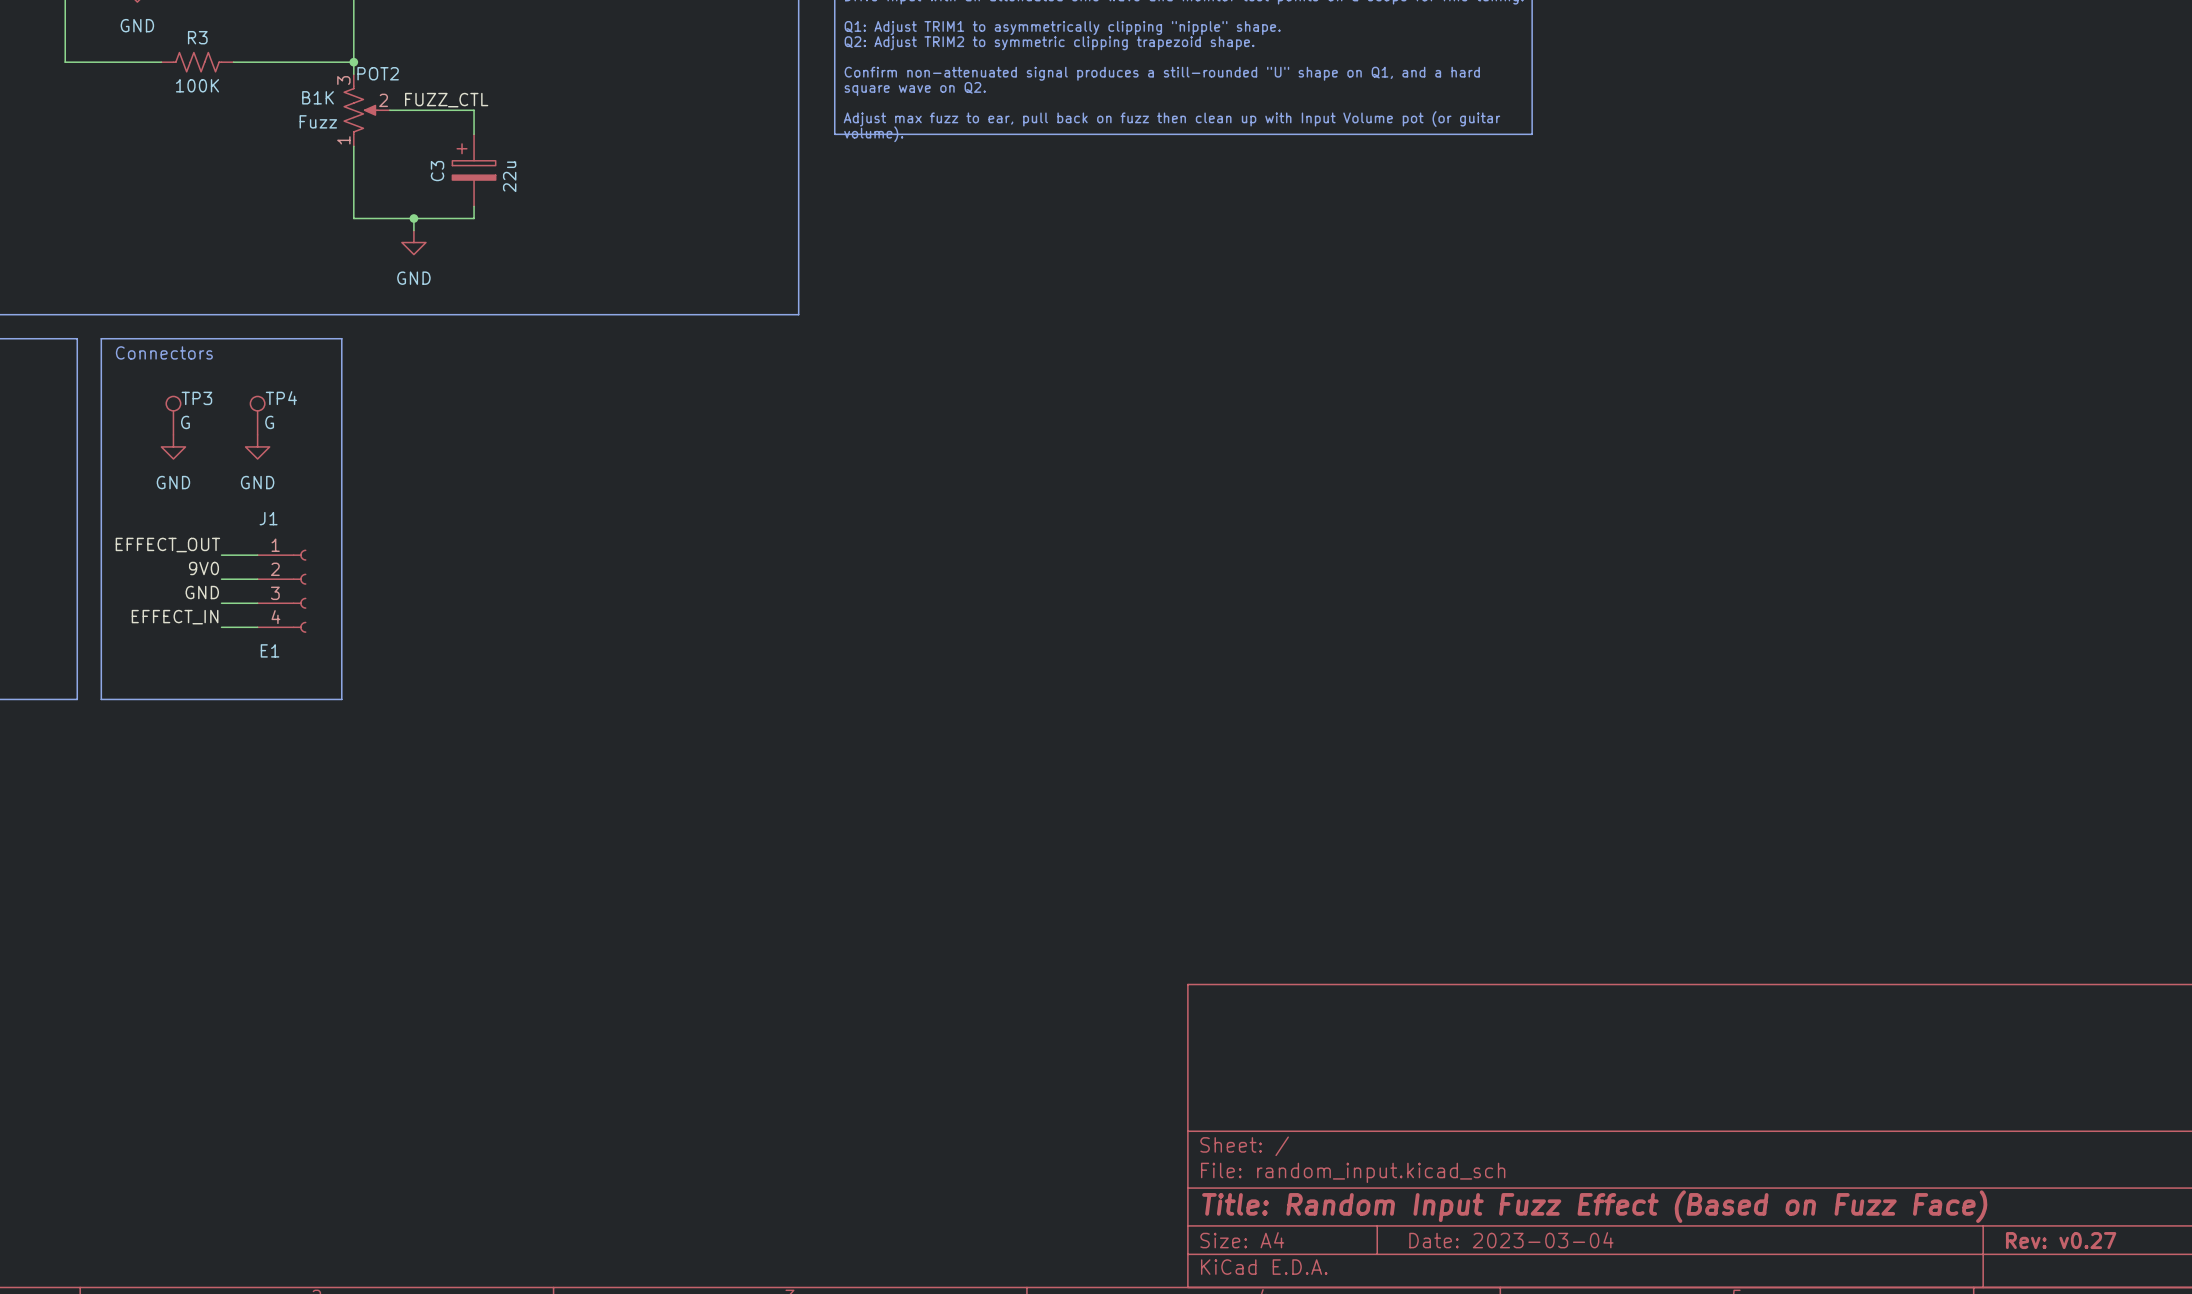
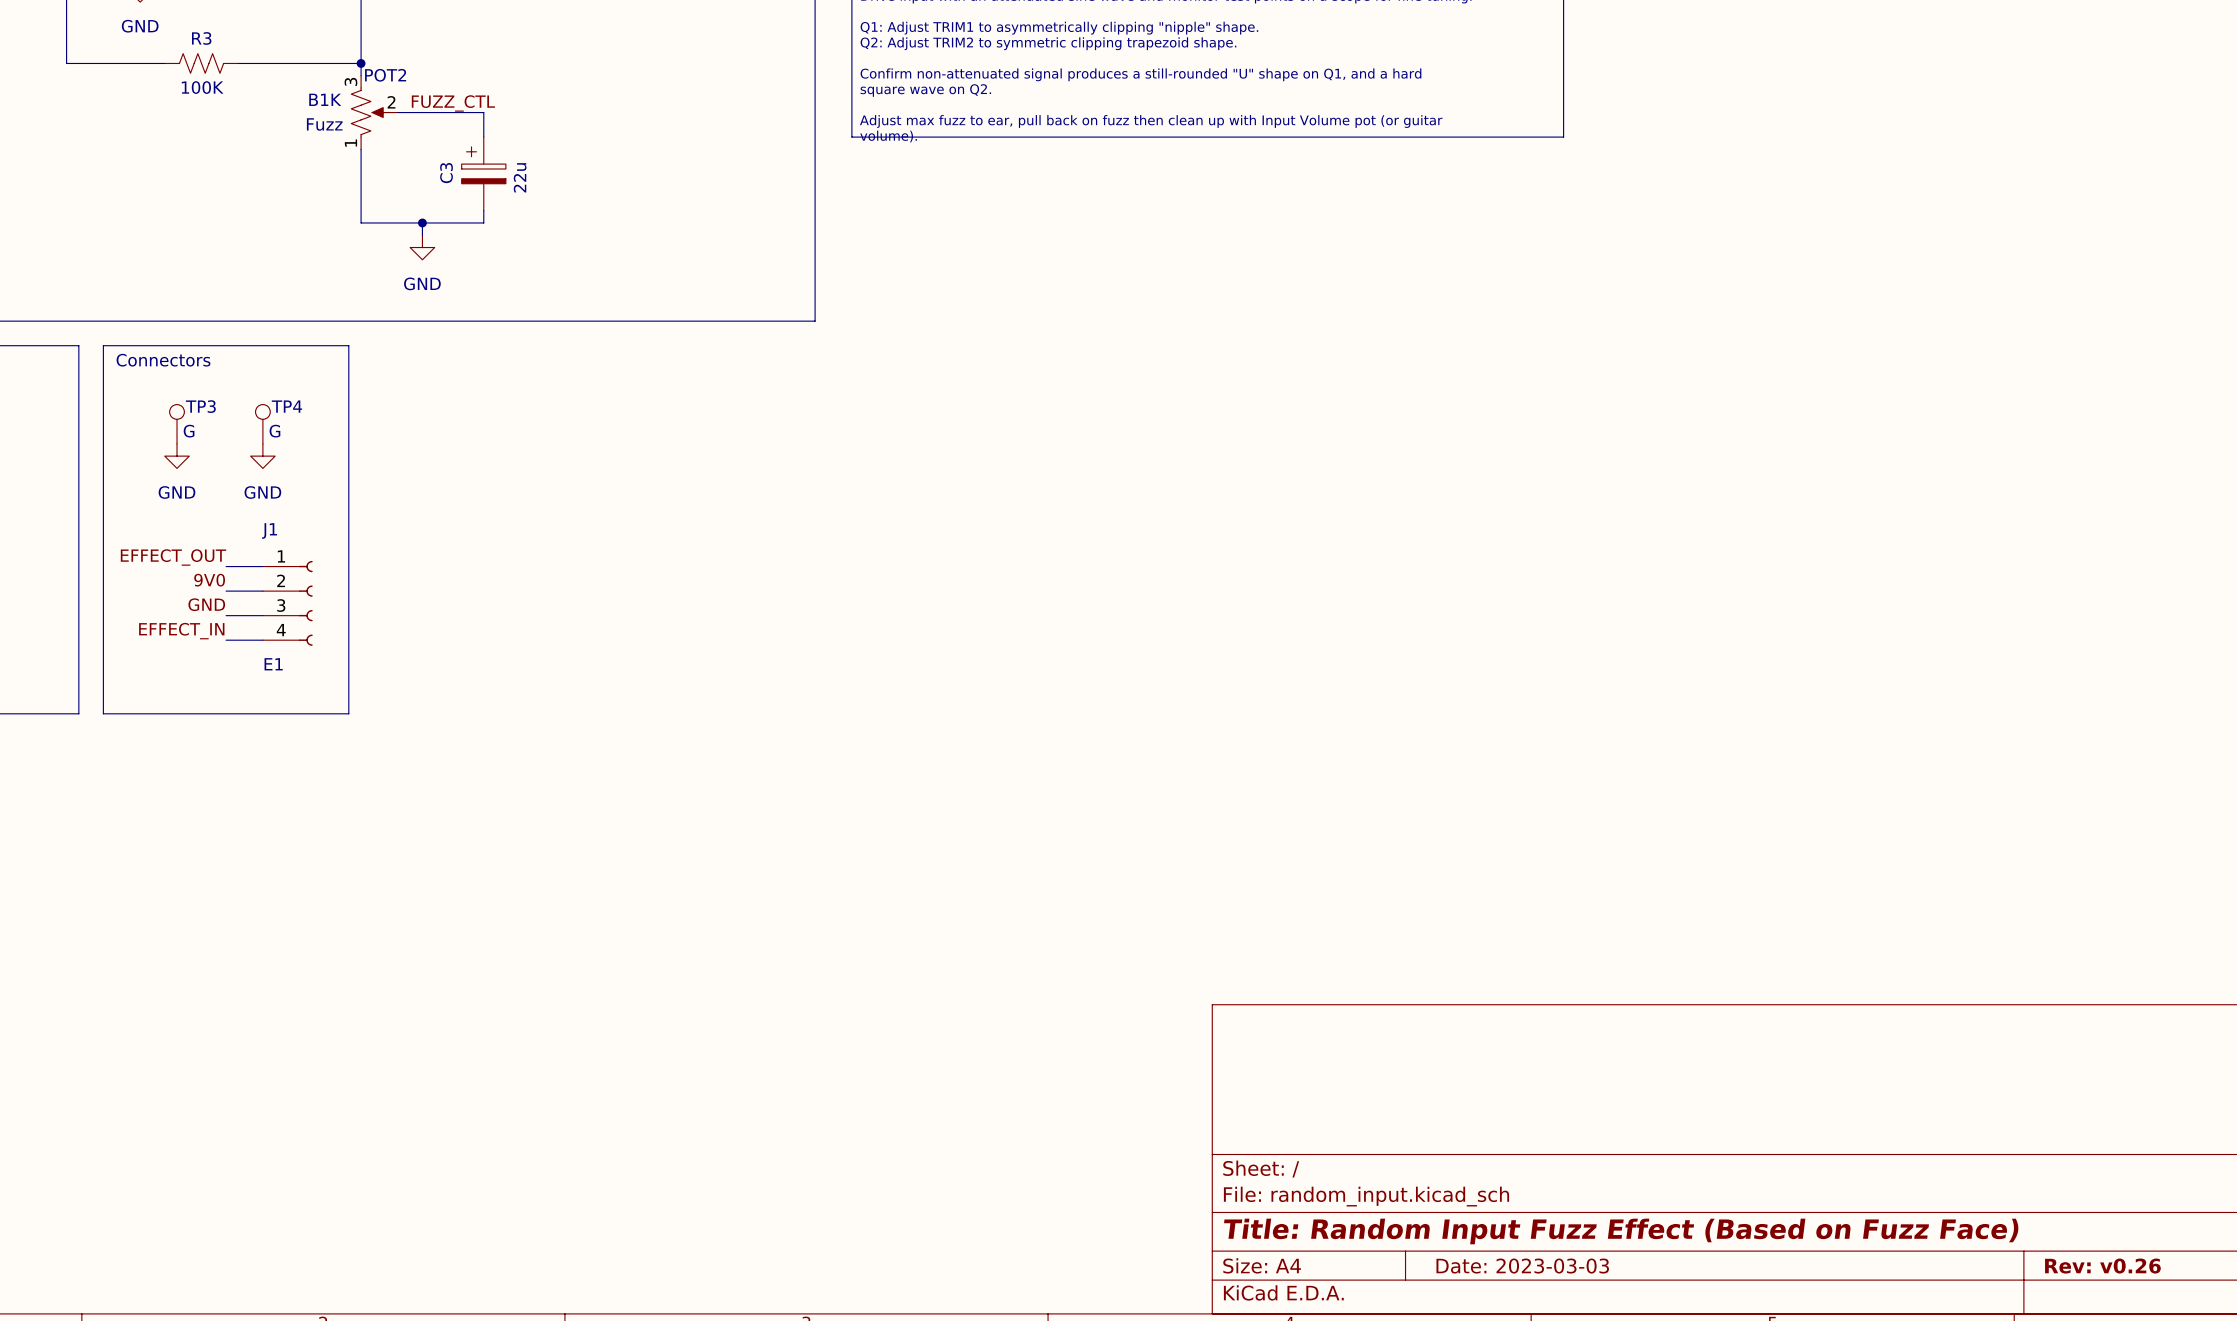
title block: Date: 2023-03-04 (1511, 1240) -> Date: 2023-03-03 (1522, 1266)
title block: Rev: v0.27 (2061, 1240) -> Rev: v0.26 (2102, 1266)

